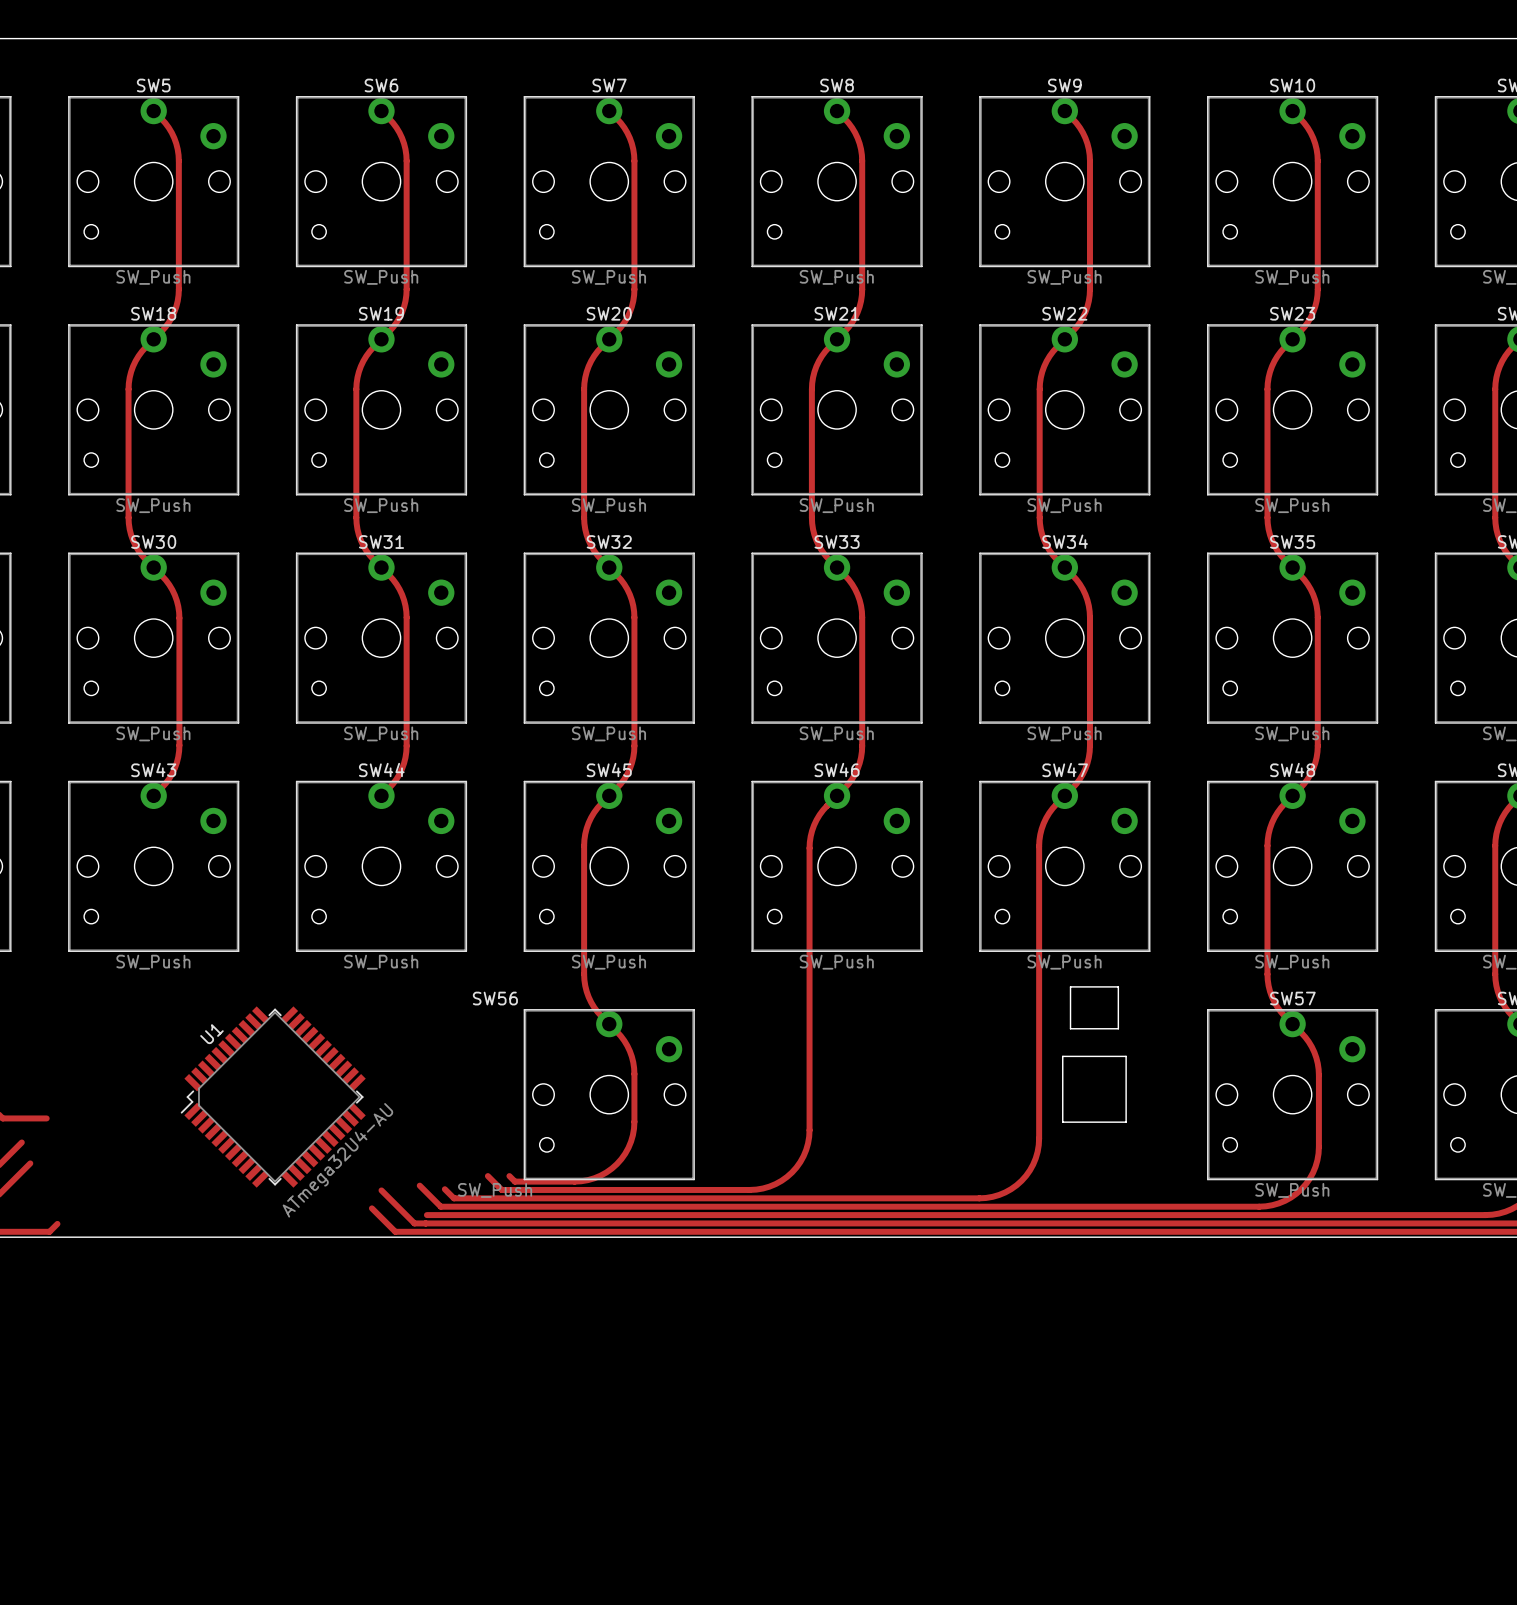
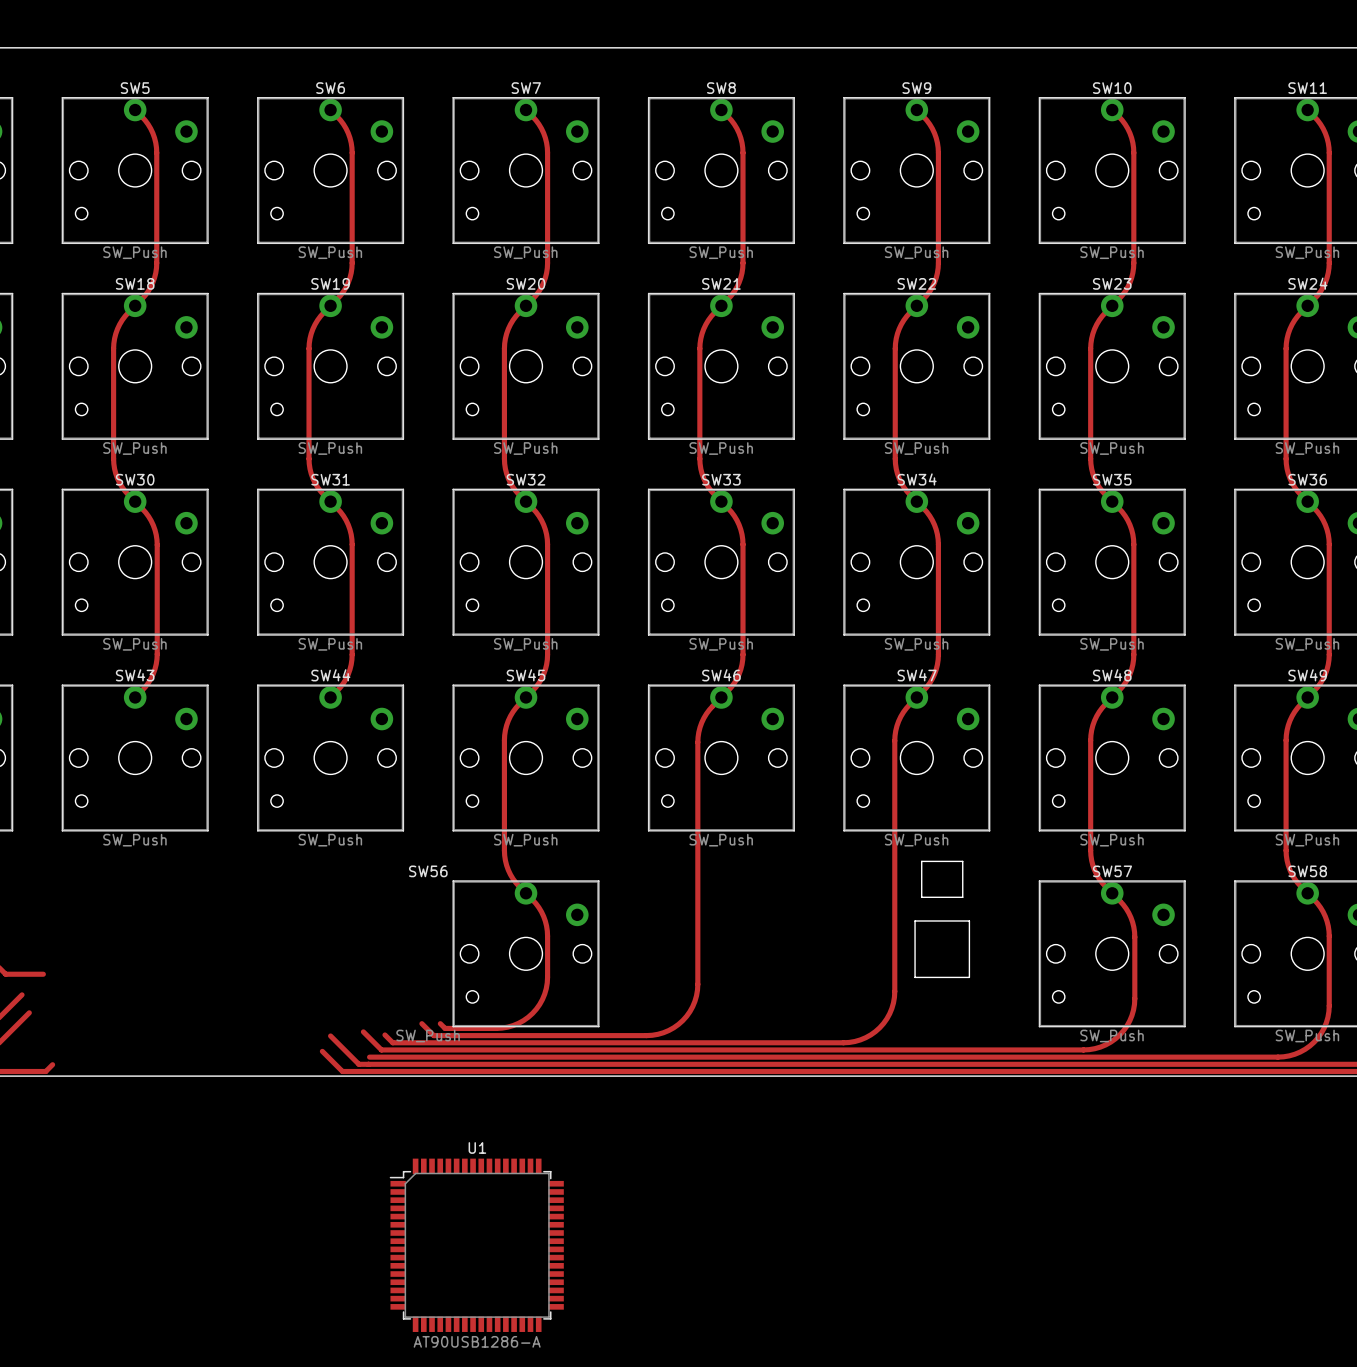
U1 footprint: [180, 1006, 366, 1188] -> [389, 1158, 564, 1332]
U1 name position: U1 (211, 1034) -> U1 (477, 1147)
U1 value: ATmega32U4-AU (337, 1160) -> AT90USB1286-A (477, 1341)

